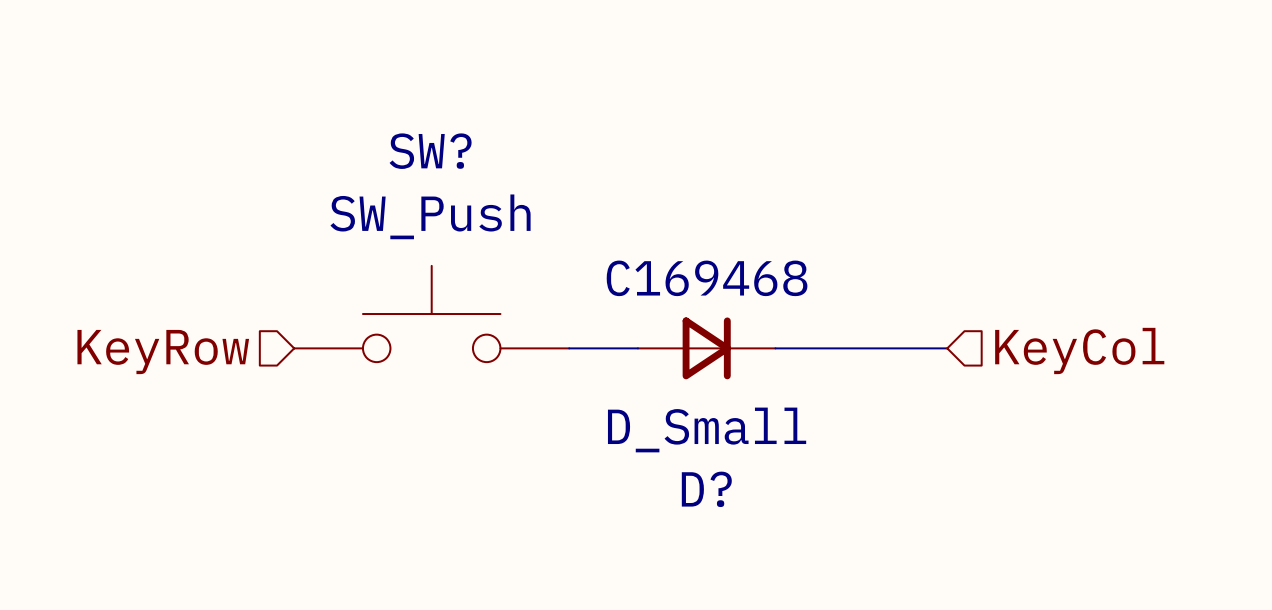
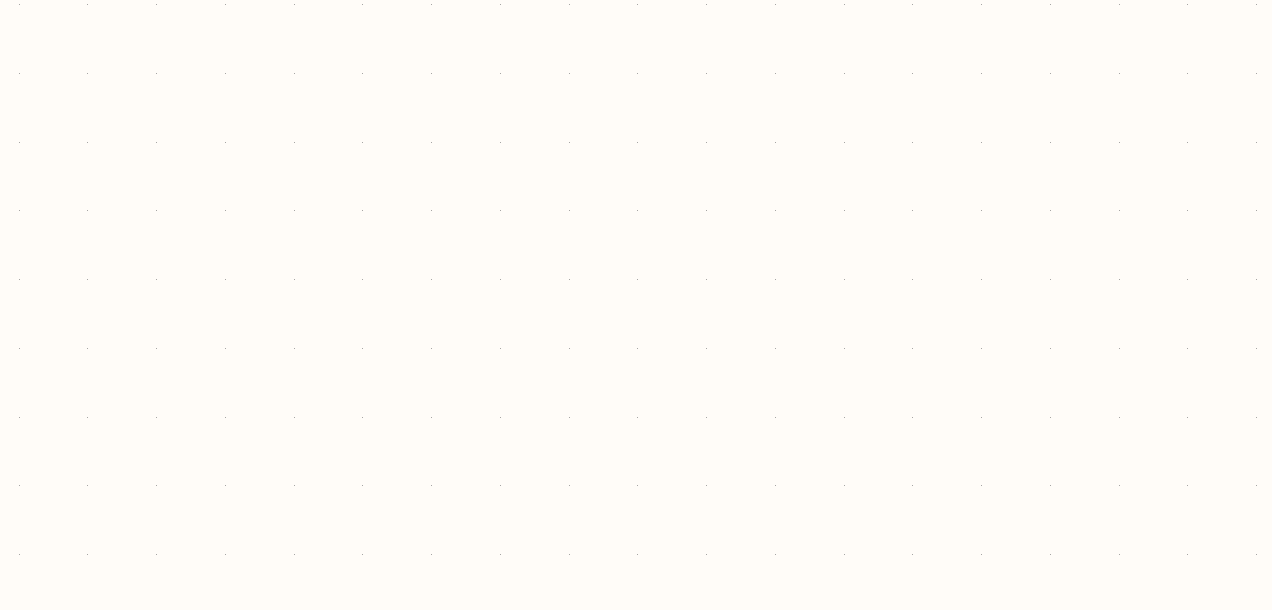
SW?: SW_Push (431, 314) -> none
wire: (569, 348) (637, 348) -> none
D?: D_Small (706, 348) -> none
wire: (775, 348) (947, 348) -> none
hierarchical label: KeyCol (1079, 350) -> none
hierarchical label: KeyRow (163, 352) -> none

